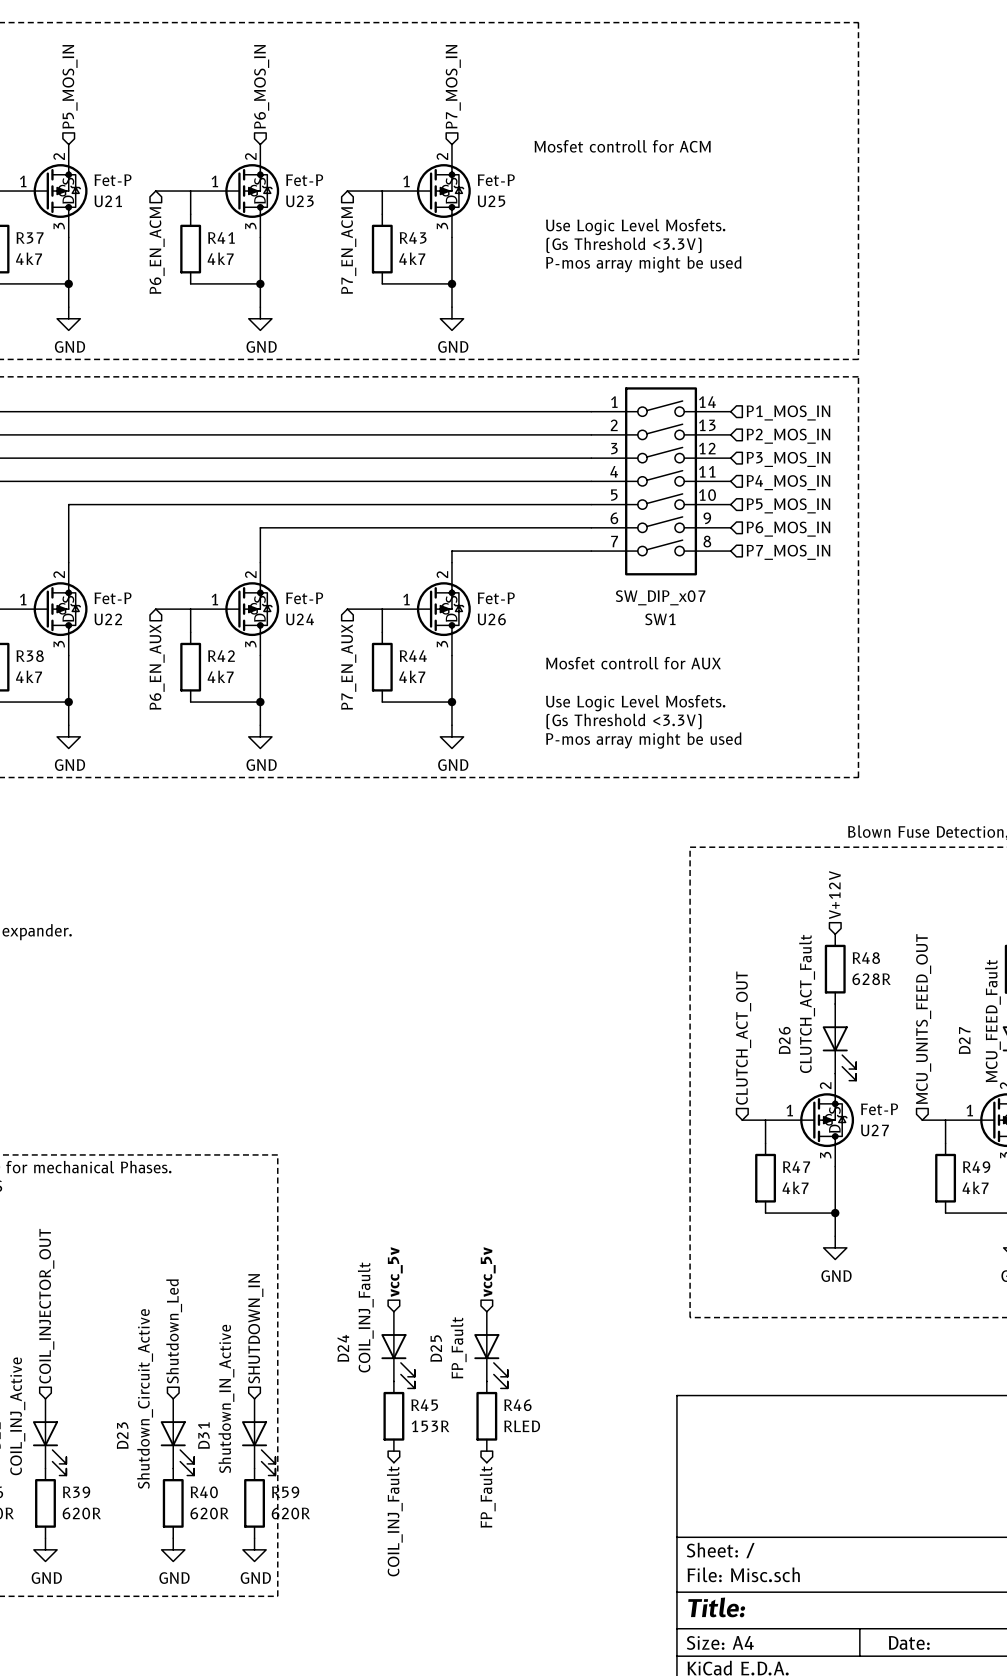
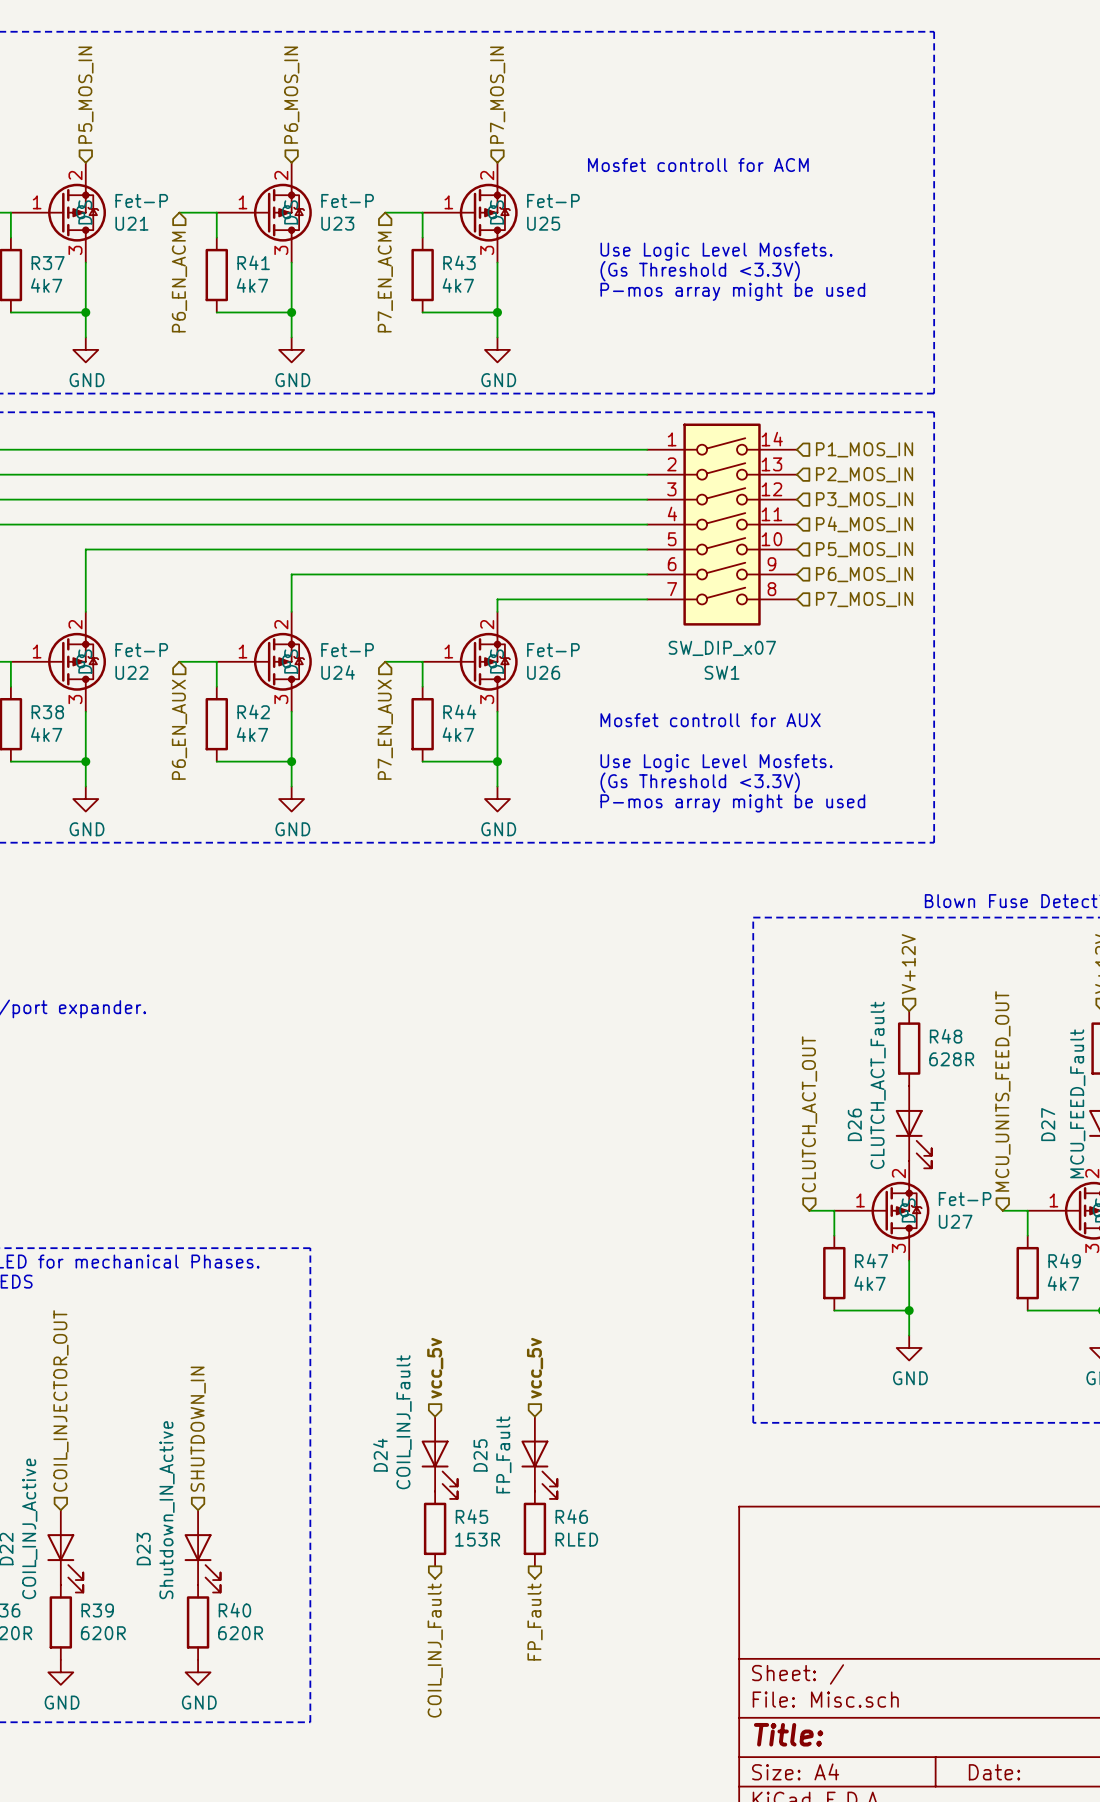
hierarchical label: SHUTDOWN_IN (255, 1328) -> none
hierarchical label: Shutdown_Led (174, 1331) -> SHUTDOWN_IN (198, 1429)
D23 value: Shutdown_Circuit_Active (145, 1398) -> Shutdown_IN_Active (166, 1510)
D31: Shutdown_IN_Active (258, 1437) -> none
R59: 620R (254, 1503) -> none
power symbol: GND (254, 1549) -> none

